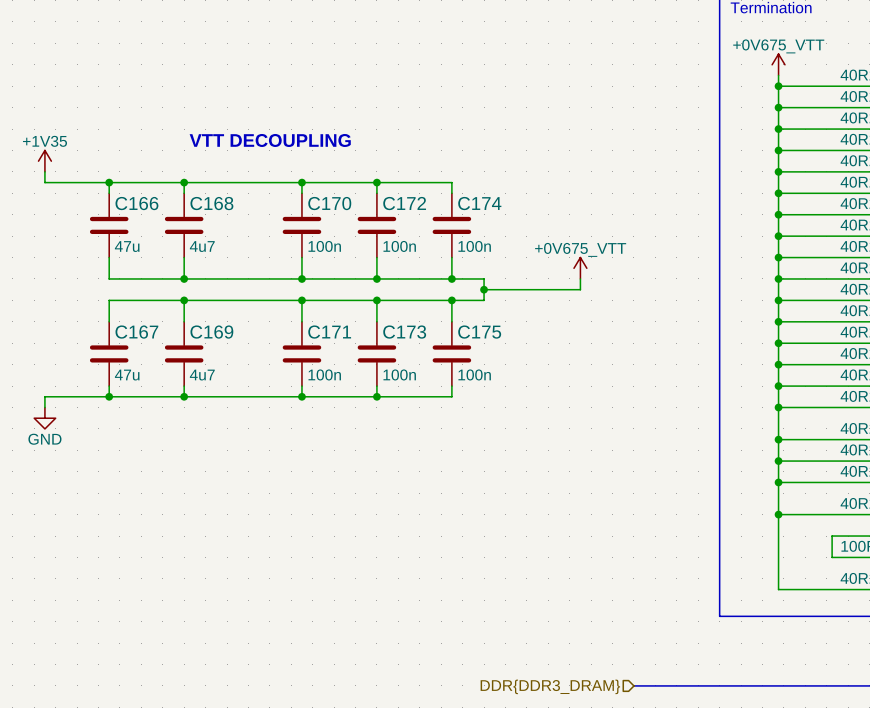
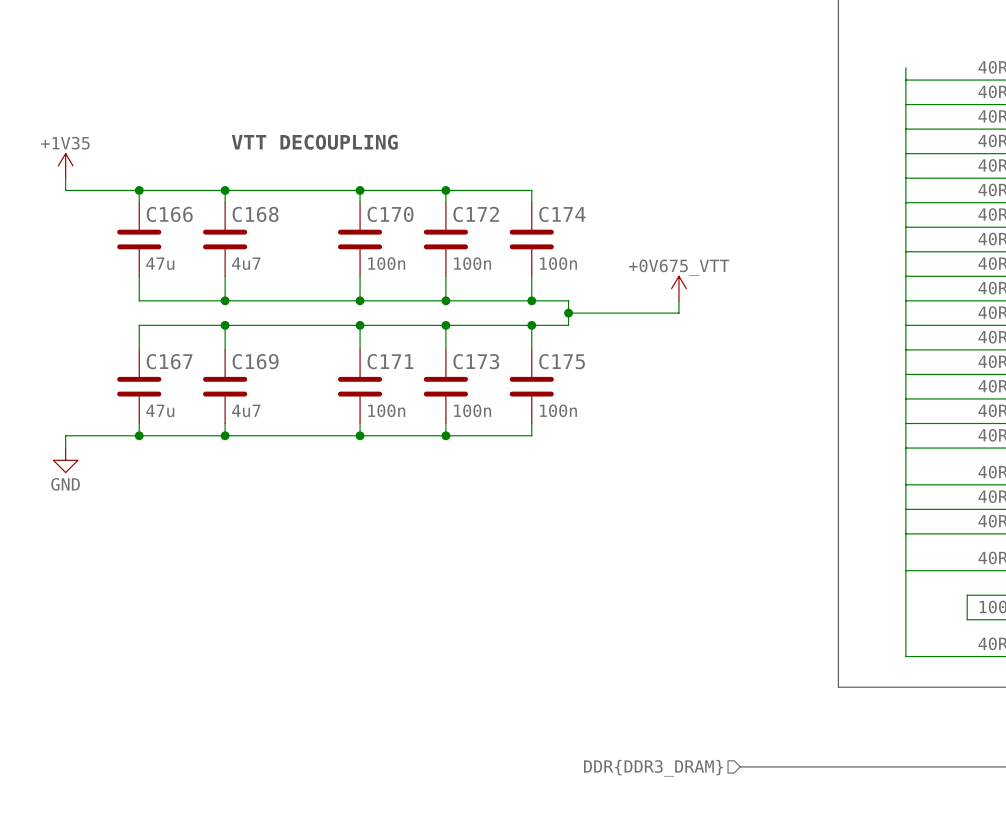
power symbol: +0V675_VTT (778, 64) -> none
junction: (778, 86) -> none
junction: (778, 107) -> none
junction: (778, 129) -> none
junction: (778, 150) -> none
junction: (778, 171) -> none
junction: (778, 193) -> none
junction: (778, 214) -> none
junction: (778, 236) -> none
junction: (778, 257) -> none
junction: (778, 278) -> none
junction: (778, 300) -> none
junction: (778, 321) -> none
junction: (778, 343) -> none
junction: (778, 364) -> none
junction: (778, 386) -> none
junction: (778, 407) -> none
junction: (778, 439) -> none
junction: (778, 461) -> none
junction: (778, 482) -> none
junction: (778, 514) -> none

